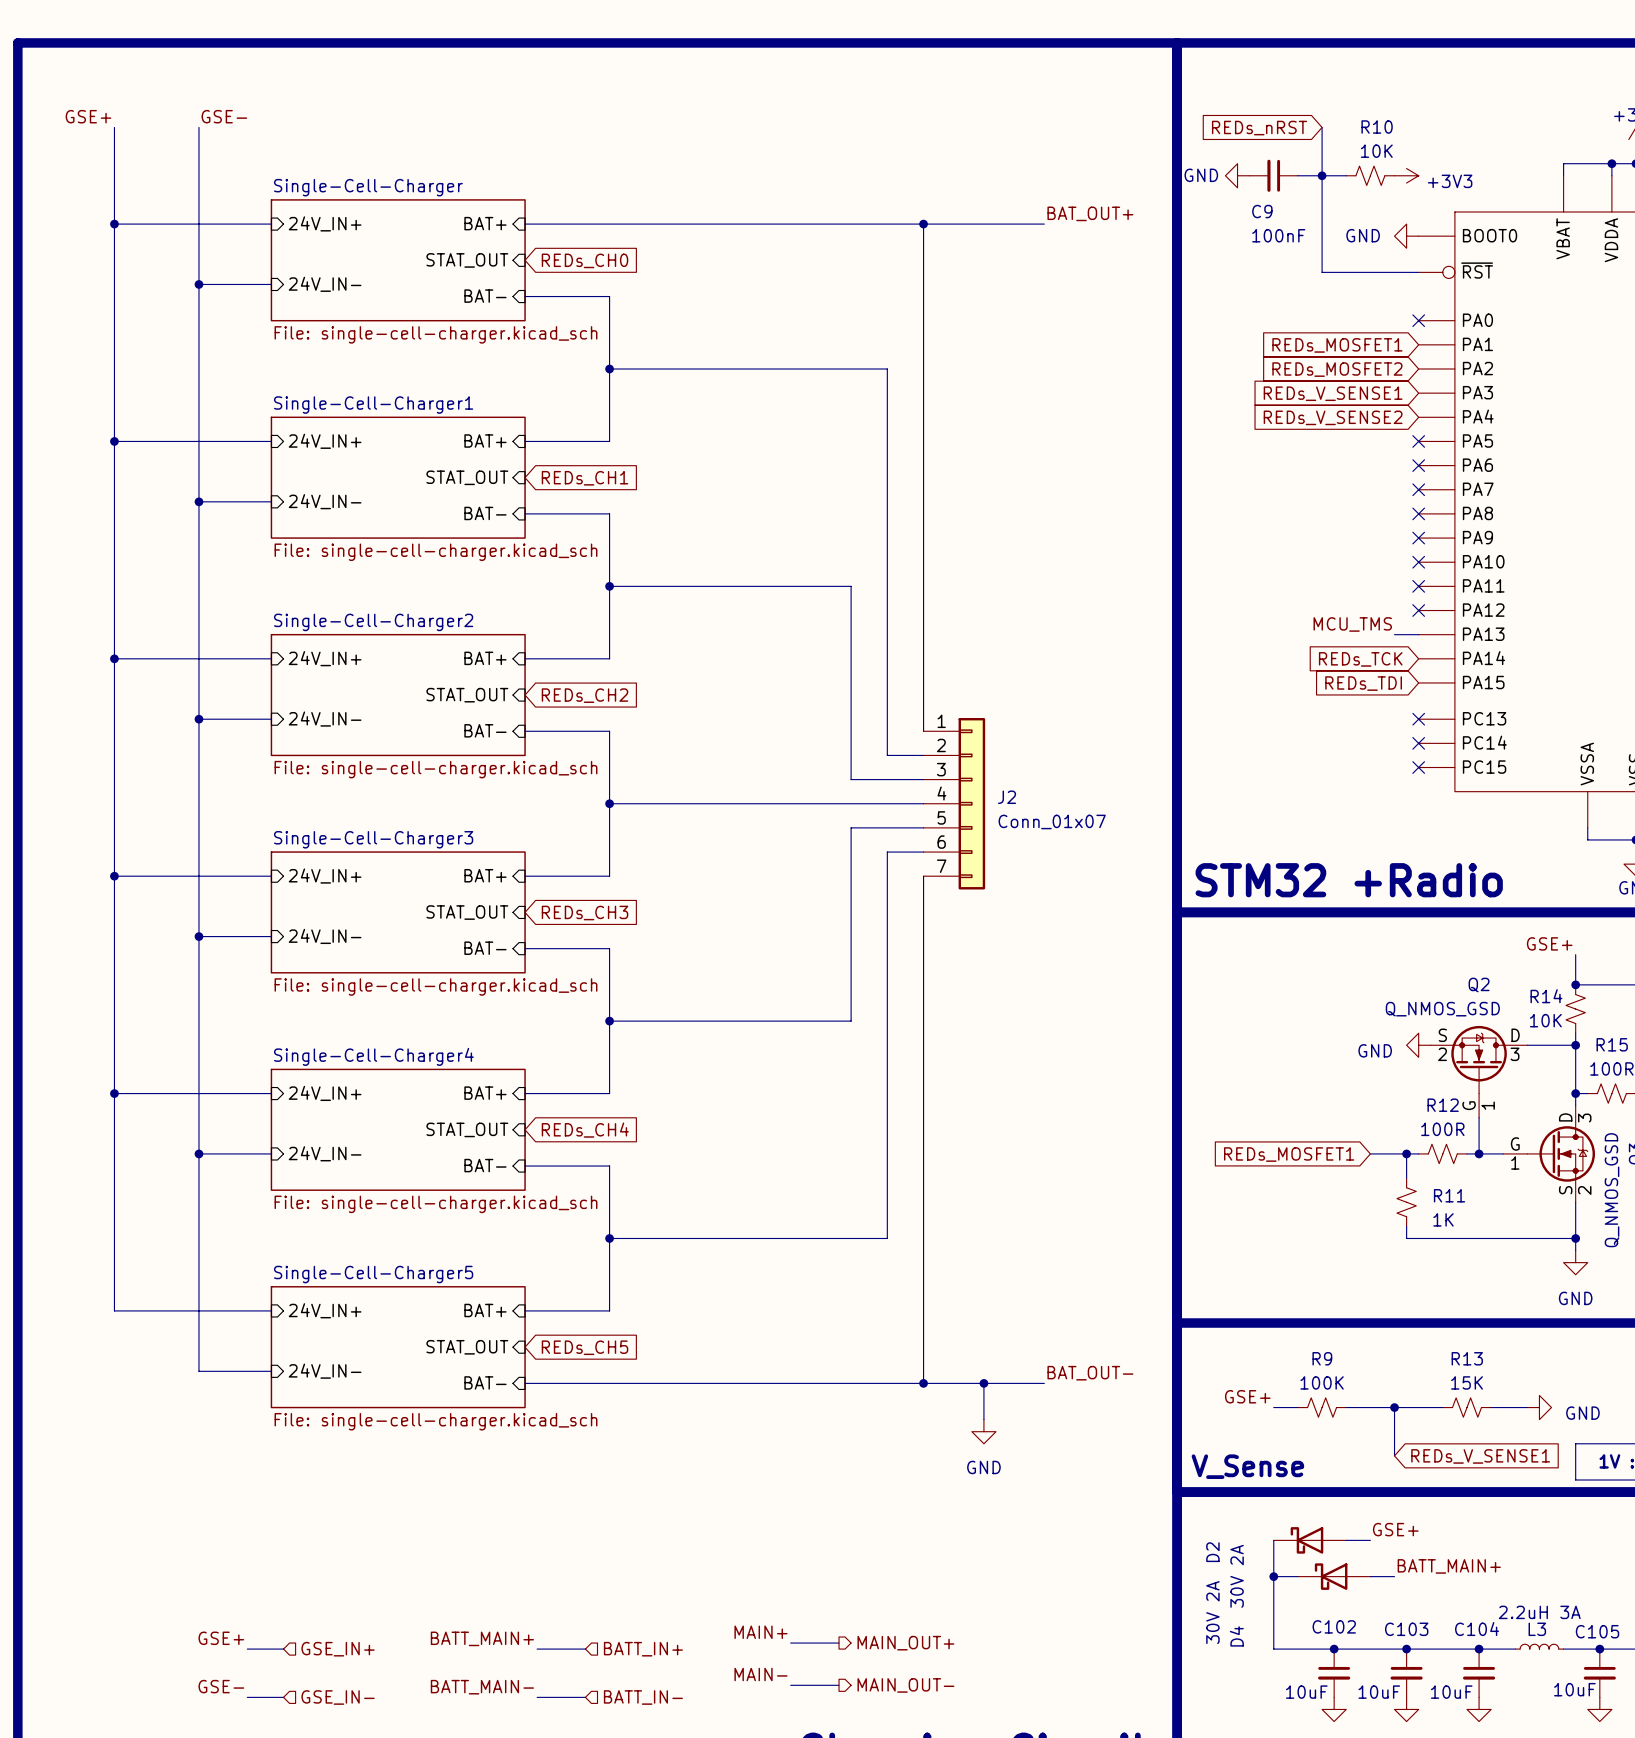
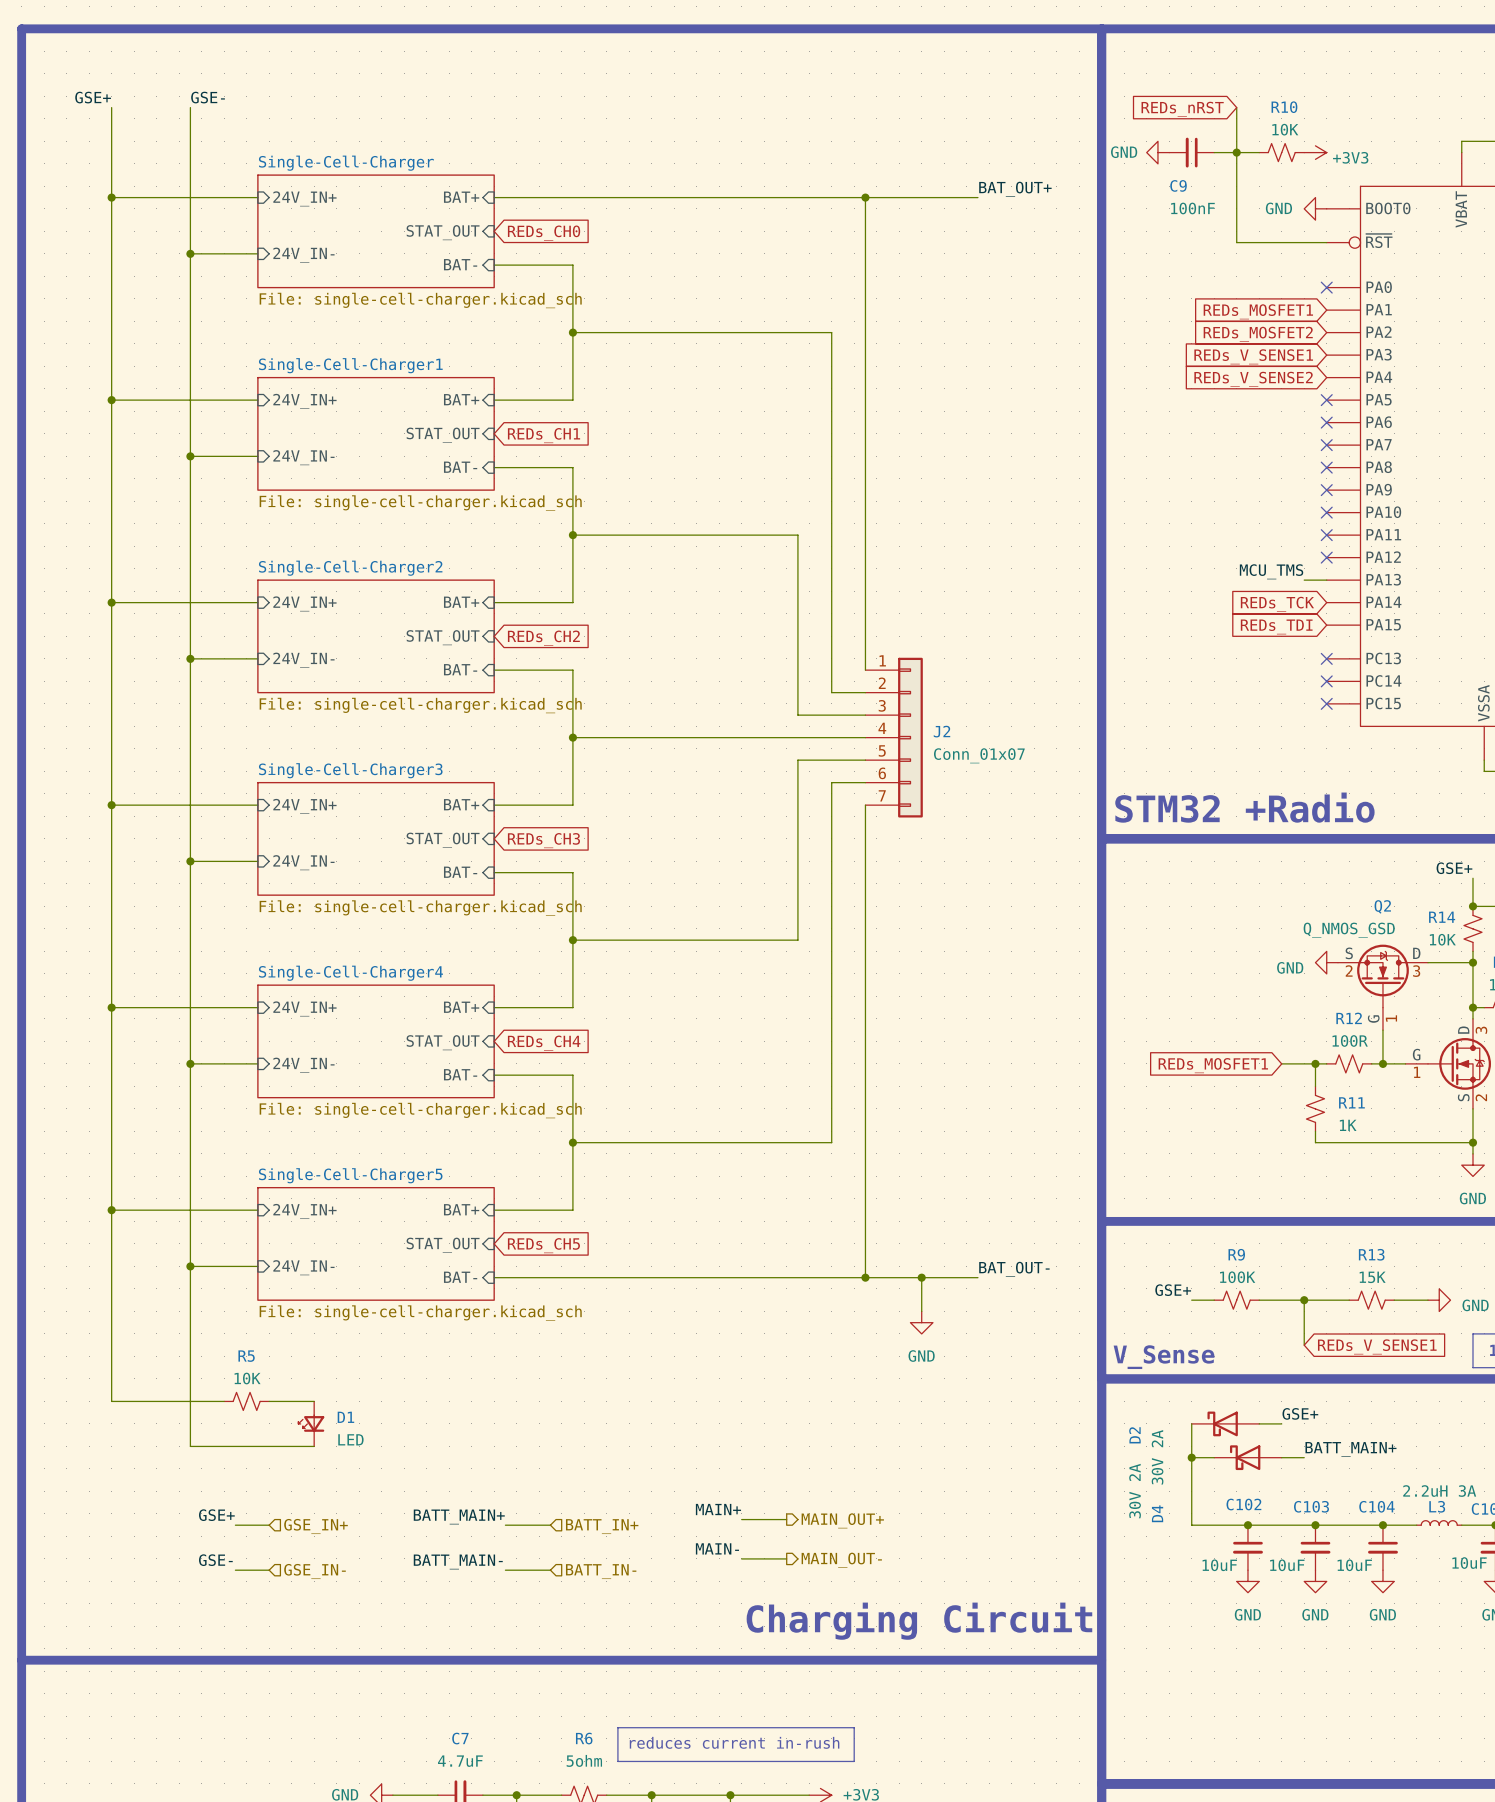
wire: none -> (111, 1210) (111, 1401) (224, 1401)
junction: none -> (111, 1210)
wire: none -> (190, 1266) (190, 1446) (314, 1446)
junction: none -> (190, 1266)
R5: none -> 10K (246, 1401)
wire: none -> (269, 1401) (314, 1401)
D1: none -> LED (311, 1423)

